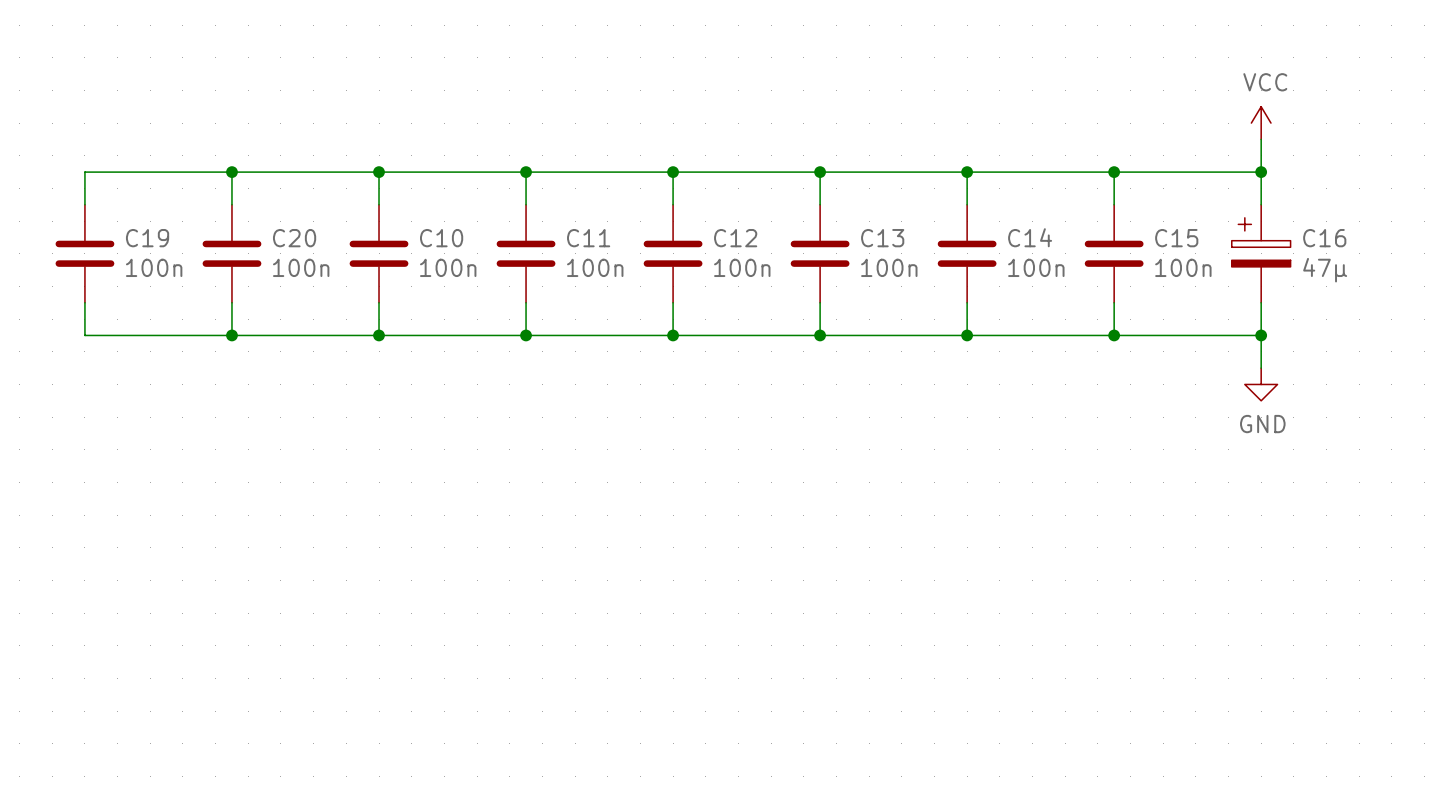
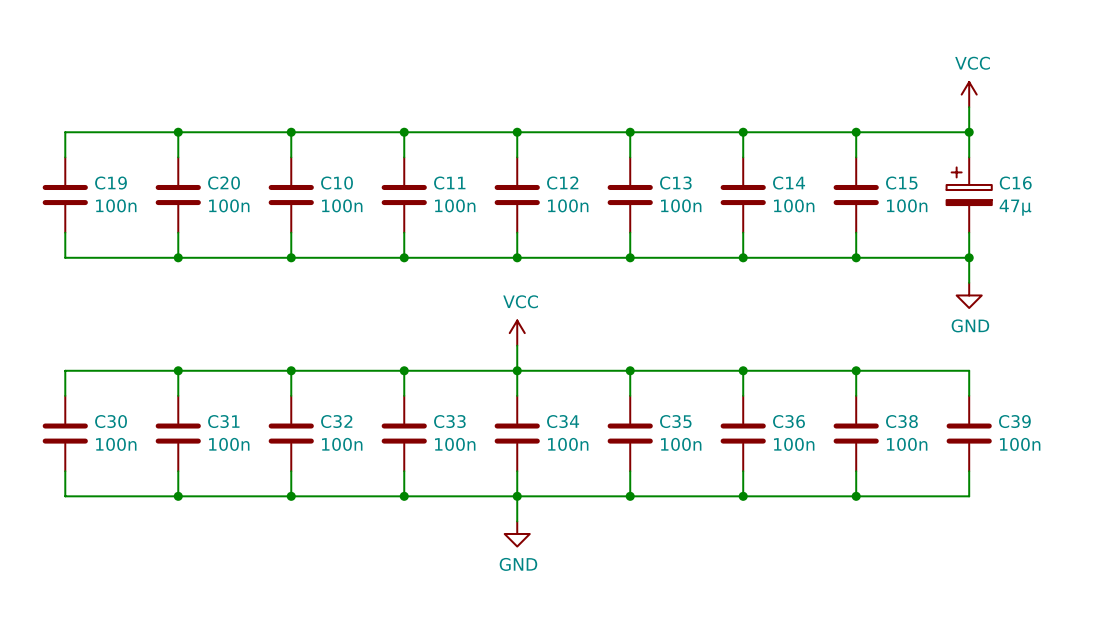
power symbol: none -> VCC (517, 333)
wire: none -> (517, 345) (517, 395)
wire: none -> (178, 370) (178, 395)
junction: none -> (178, 370)
wire: none -> (291, 370) (291, 395)
junction: none -> (291, 370)
wire: none -> (404, 370) (404, 395)
junction: none -> (404, 370)
junction: none -> (517, 370)
wire: none -> (630, 370) (630, 395)
junction: none -> (630, 370)
wire: none -> (743, 370) (743, 395)
junction: none -> (743, 370)
wire: none -> (856, 370) (856, 395)
junction: none -> (856, 370)
wire: none -> (65, 395) (65, 370) (969, 370) (969, 395)
C30: none -> 100n (65, 433)
C31: none -> 100n (178, 433)
C32: none -> 100n (291, 433)
C33: none -> 100n (404, 433)
C34: none -> 100n (517, 433)
C35: none -> 100n (630, 433)
C36: none -> 100n (743, 433)
C38: none -> 100n (856, 433)
C39: none -> 100n (969, 433)
wire: none -> (65, 471) (65, 496) (969, 496) (969, 471)
wire: none -> (178, 471) (178, 496)
wire: none -> (291, 471) (291, 496)
wire: none -> (404, 471) (404, 496)
wire: none -> (517, 471) (517, 521)
wire: none -> (630, 471) (630, 496)
wire: none -> (743, 471) (743, 496)
wire: none -> (856, 471) (856, 496)
junction: none -> (178, 496)
junction: none -> (291, 496)
junction: none -> (404, 496)
junction: none -> (517, 496)
junction: none -> (630, 496)
junction: none -> (743, 496)
junction: none -> (856, 496)
power symbol: none -> GND (517, 533)

